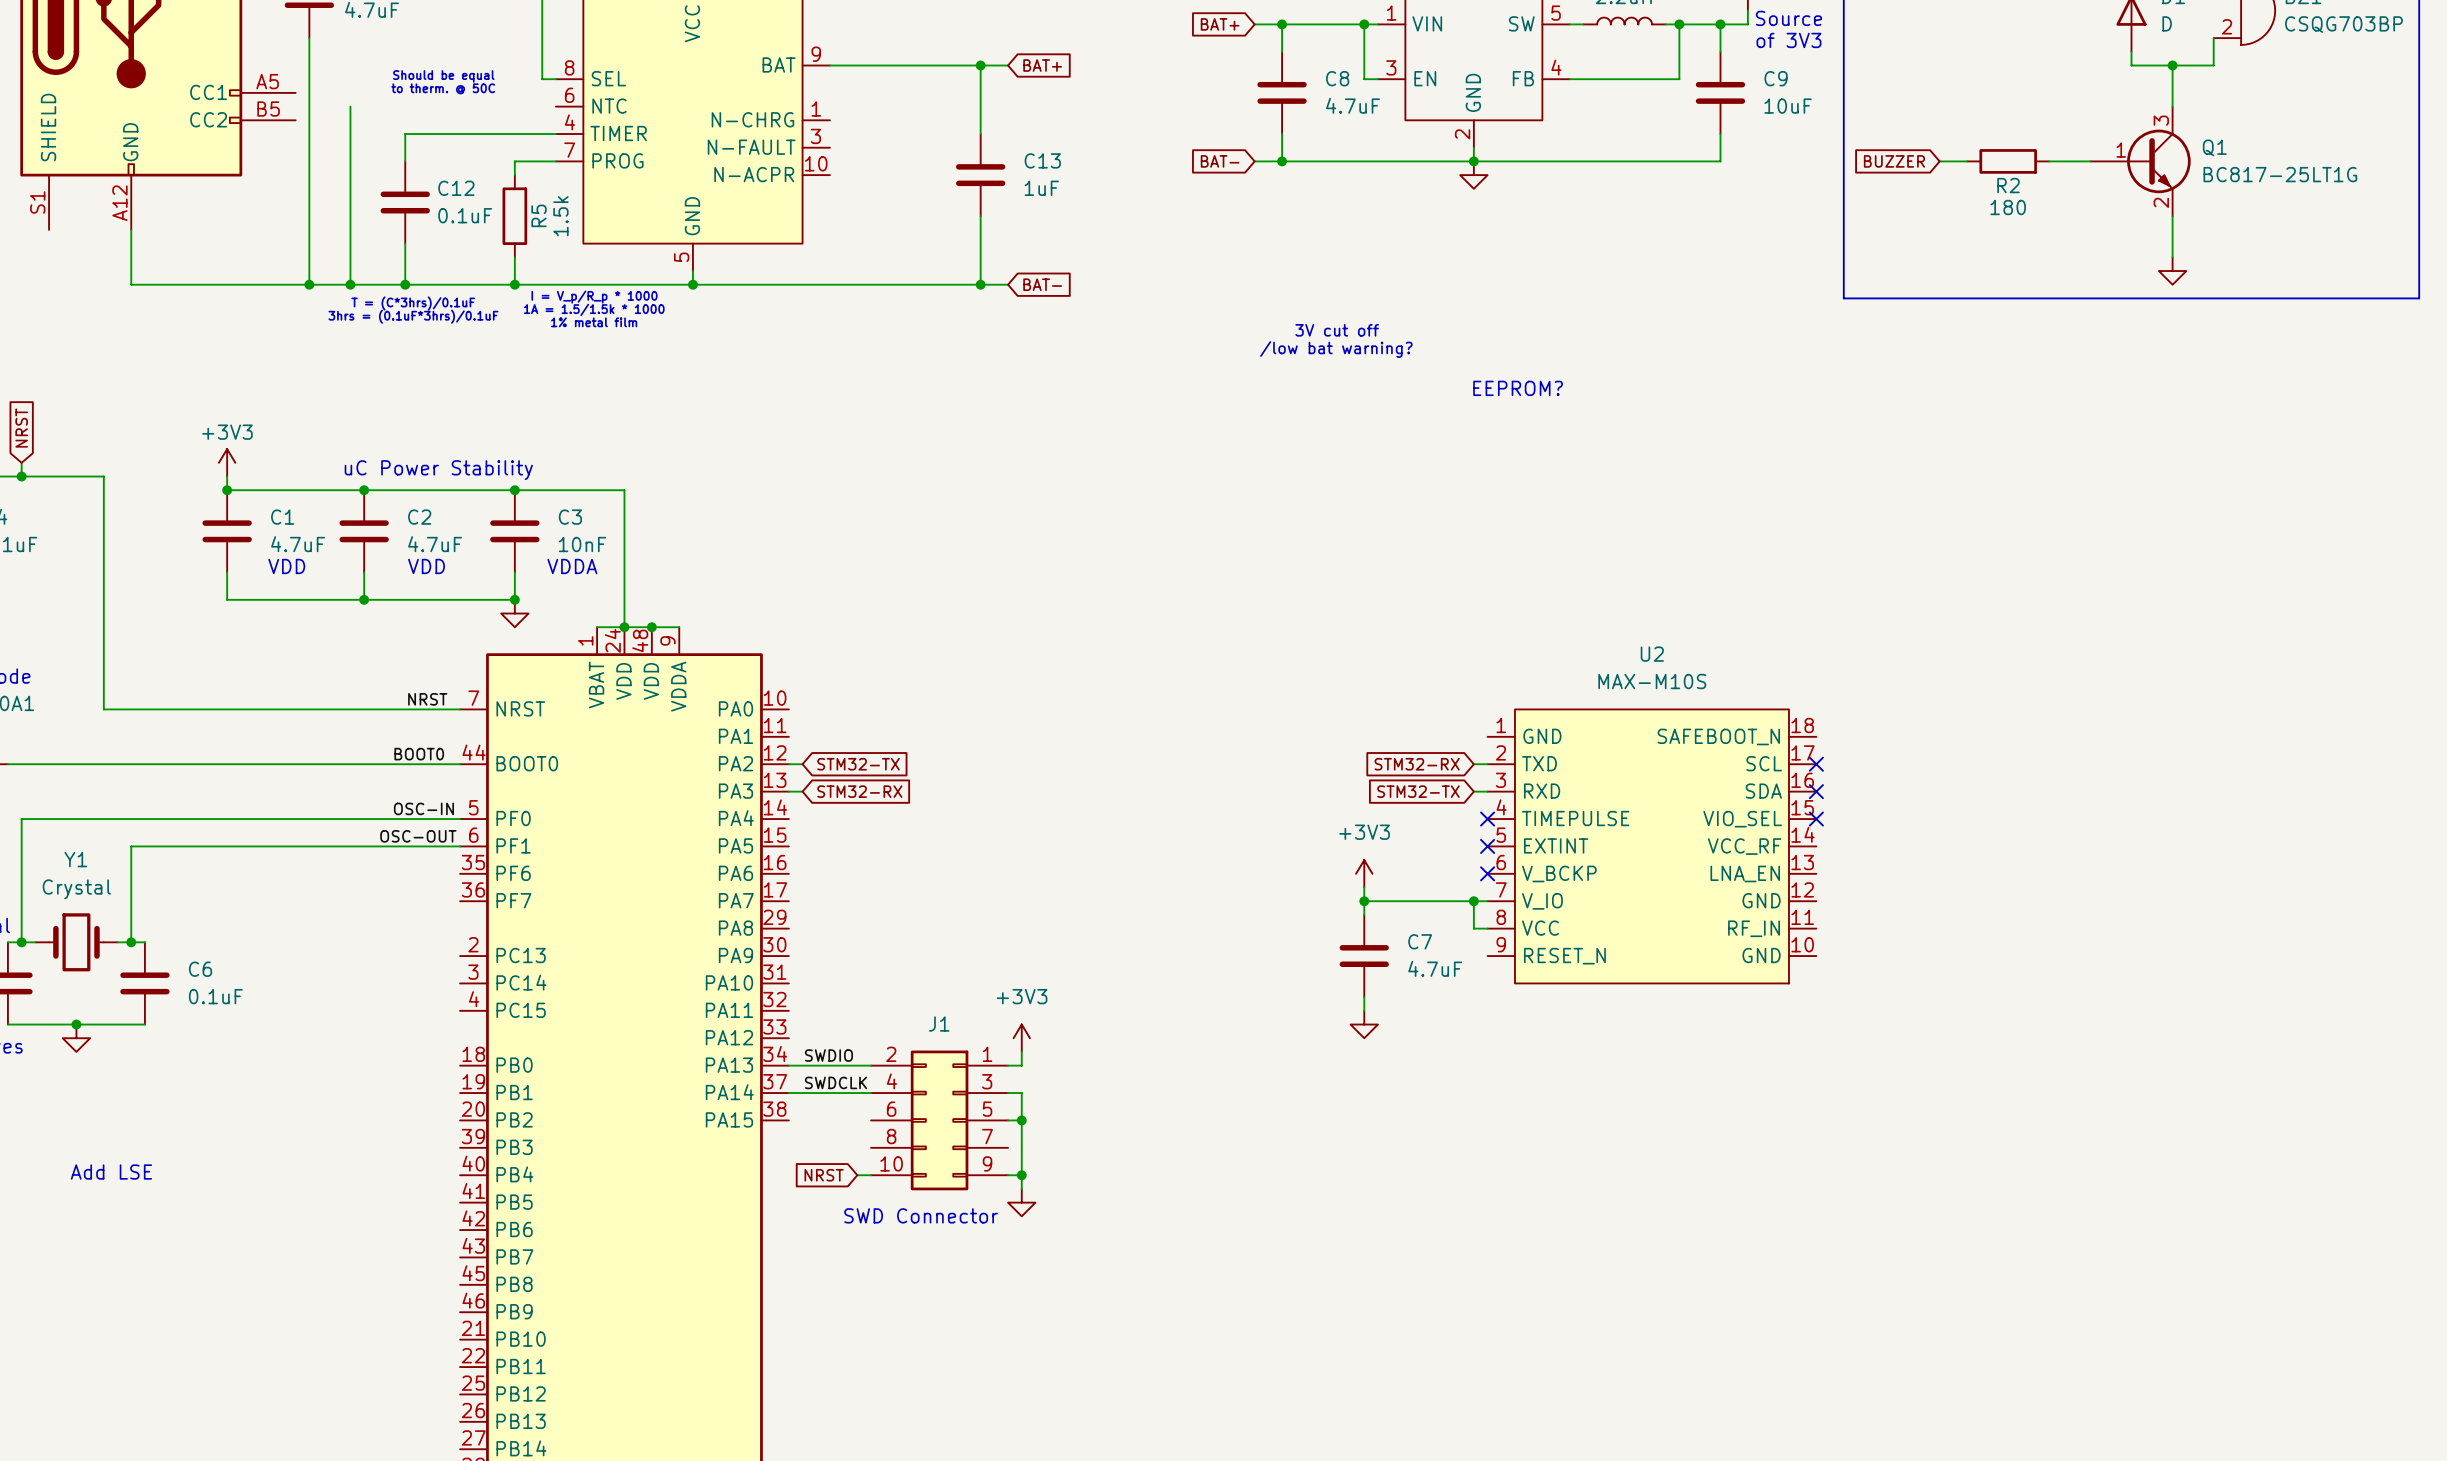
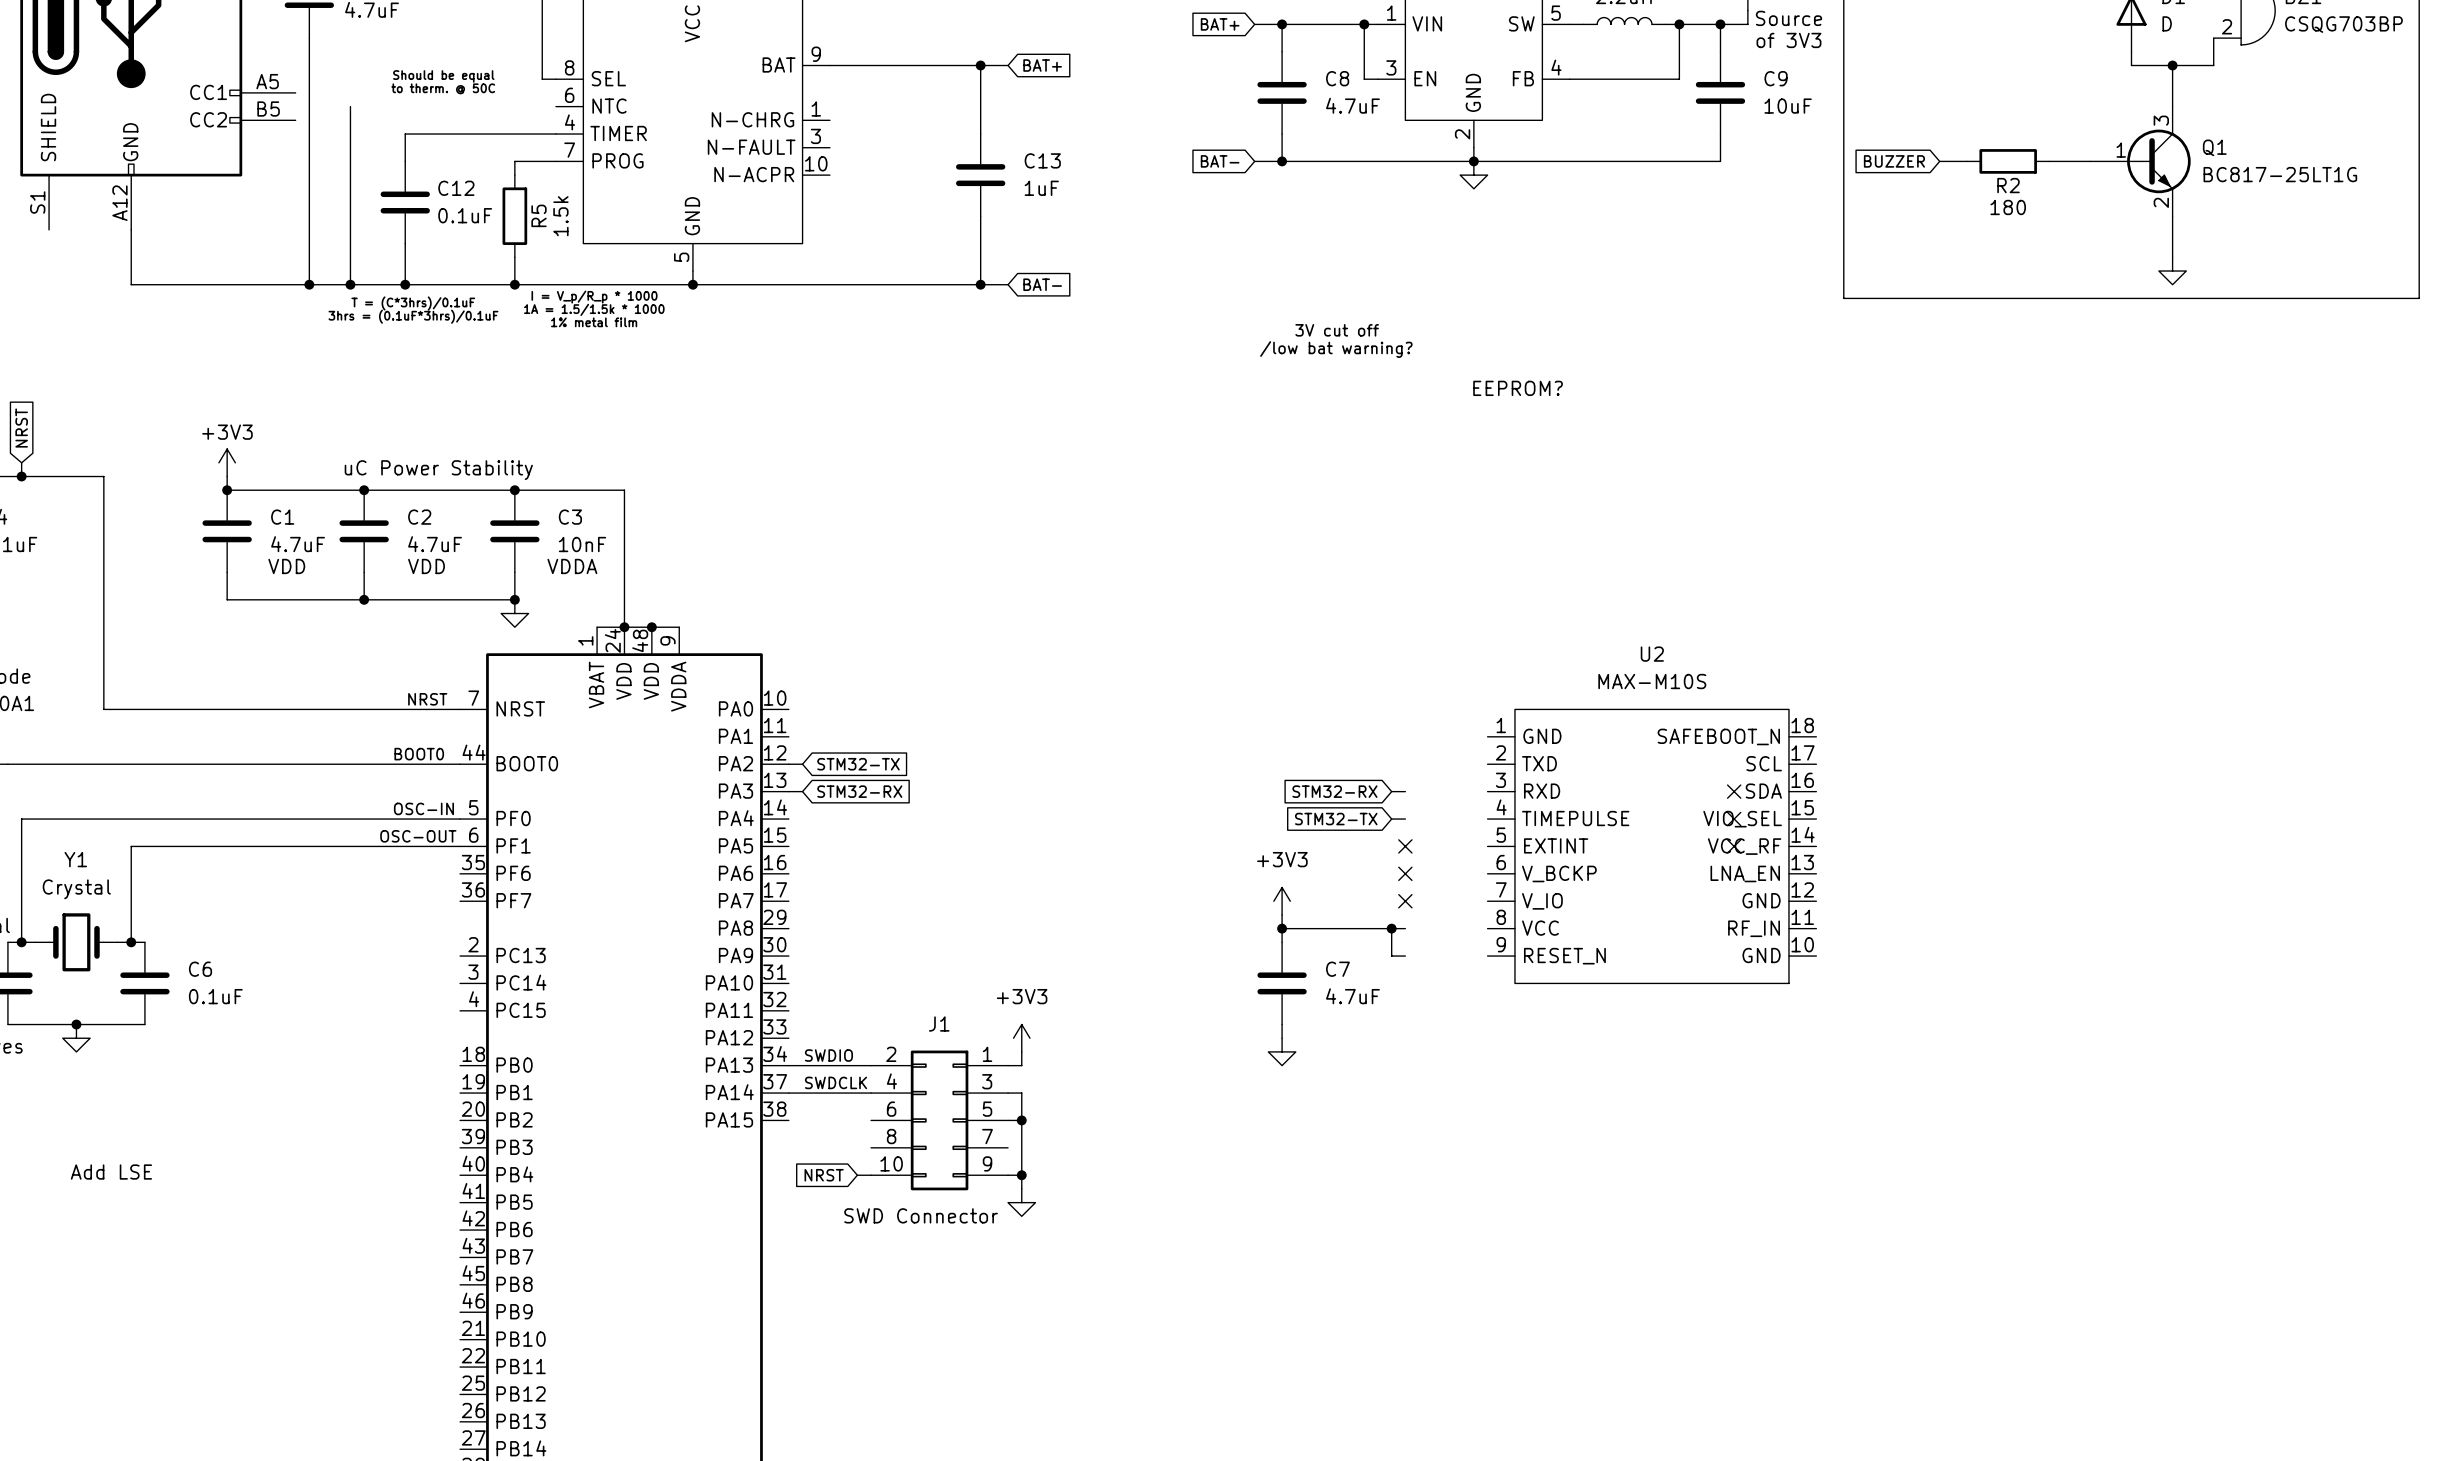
global label position: STM32-RX (1417, 764) -> STM32-RX (1334, 791)
wire: (1473, 764) (1487, 764) -> (1391, 791) (1405, 791)
no-connect mark: (1816, 764) -> none
global label position: STM32-TX (1418, 791) -> STM32-TX (1336, 819)
wire: (1473, 791) (1487, 791) -> (1391, 819) (1405, 819)
no-connect mark: none -> (1734, 791)
no-connect mark: (1816, 791) -> none
no-connect mark: (1487, 819) -> none
no-connect mark: none -> (1734, 819)
no-connect mark: (1816, 819) -> none
no-connect mark: none -> (1405, 846)
no-connect mark: (1487, 846) -> none
no-connect mark: none -> (1734, 846)
power symbol position: +3V3 (1364, 873) -> +3V3 (1282, 901)
no-connect mark: none -> (1405, 873)
no-connect mark: (1487, 873) -> none
wire: (1364, 887) (1364, 914) -> (1282, 914) (1282, 942)
wire: (1364, 901) (1487, 901) -> (1282, 928) (1405, 928)
junction position: (1364, 901) -> (1391, 928)
no-connect mark: none -> (1405, 901)
wire: (1473, 901) (1473, 928) (1487, 928) -> (1391, 928) (1391, 956) (1405, 956)
junction: (1473, 901) -> none
junction: none -> (1282, 928)
C7 position: (1364, 956) -> (1282, 983)
wire: (1364, 997) (1364, 1010) -> (1282, 1024) (1282, 1038)
power symbol position: (1364, 1024) -> (1282, 1051)

